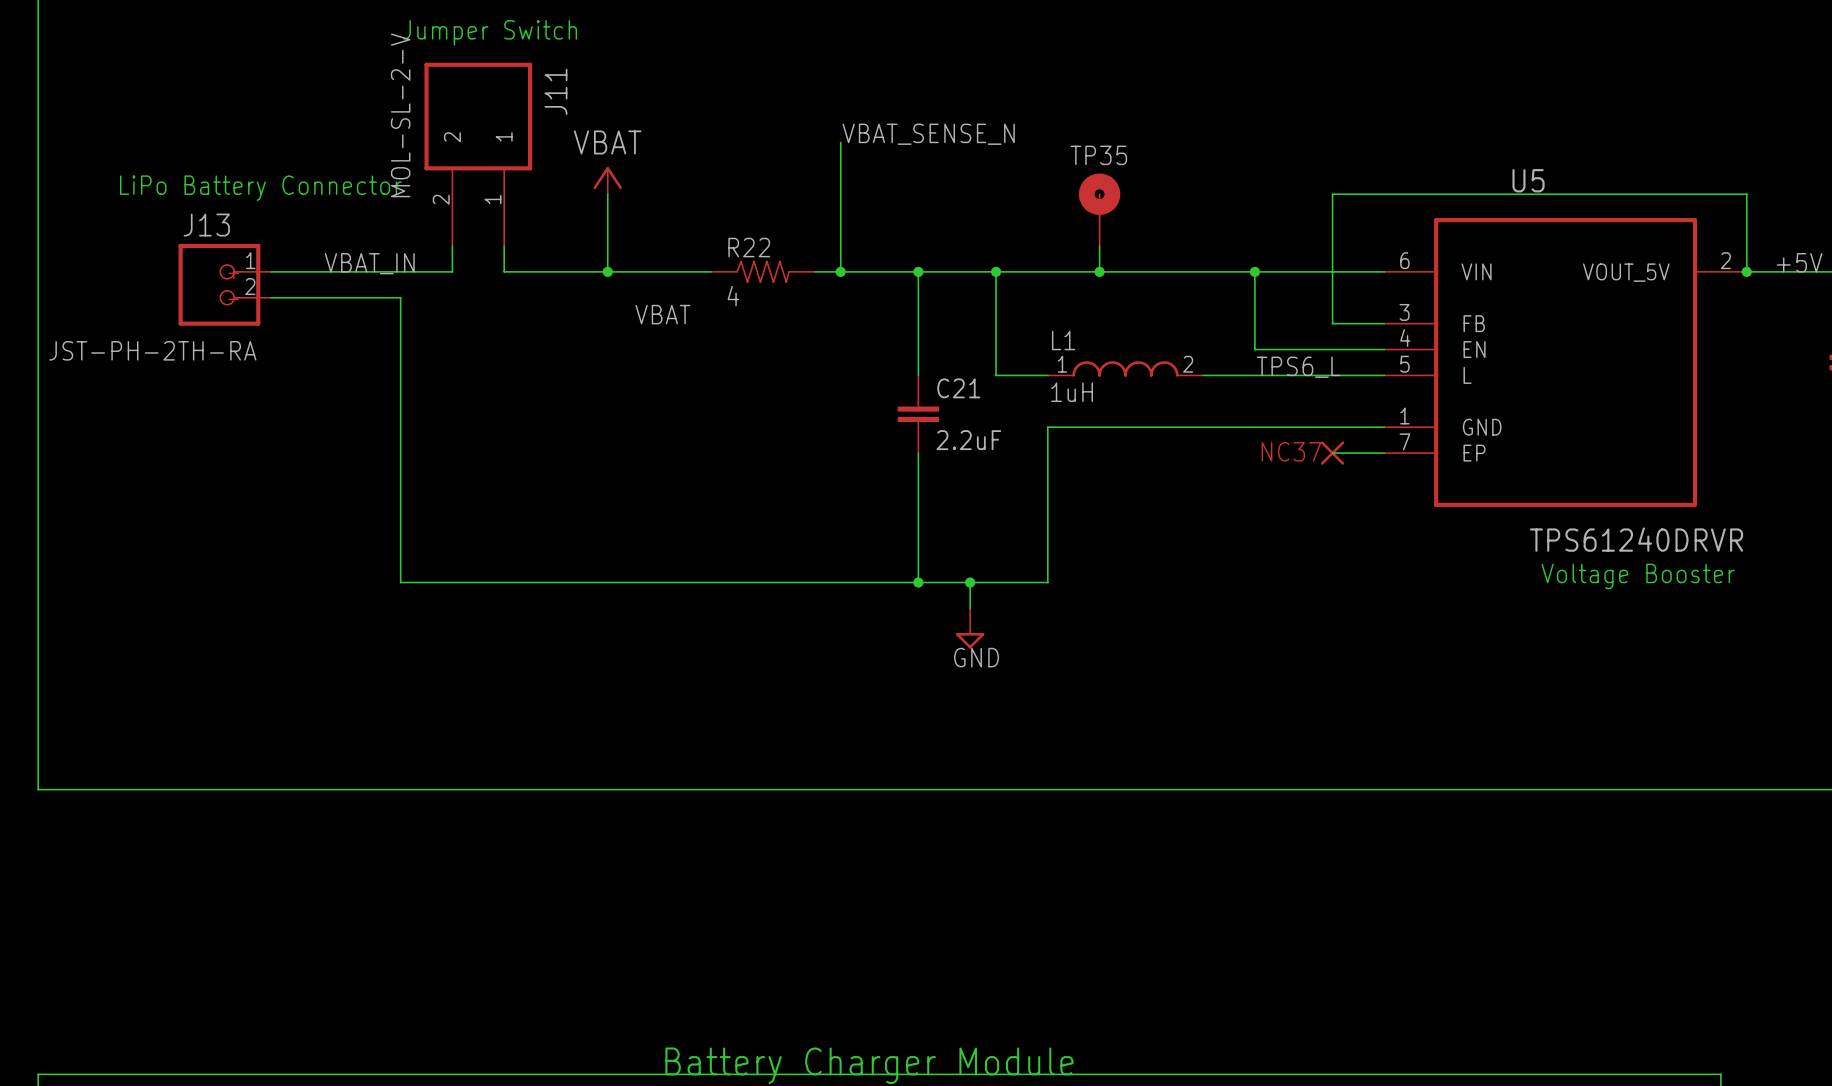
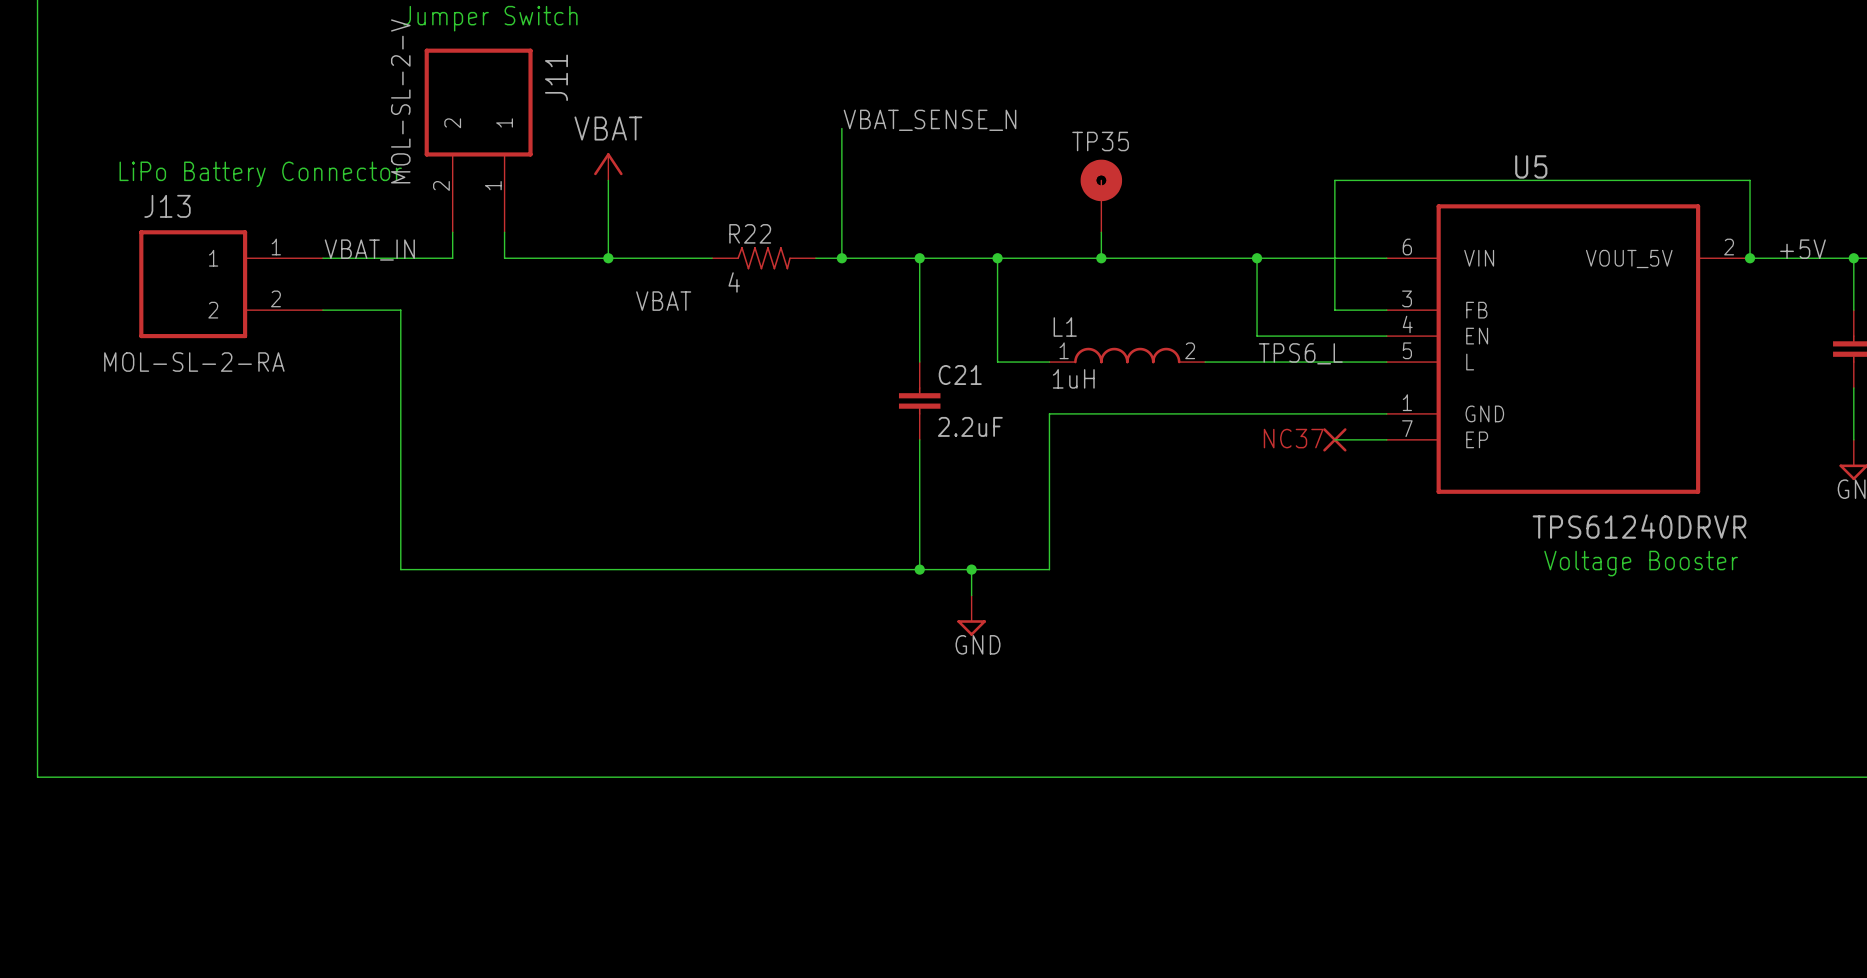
J13 name position: J13 (206, 225) -> J13 (167, 206)
J13 symbol: [178, 243, 272, 326] -> [139, 230, 323, 339]
wire: (271, 297) (400, 297) (400, 323) -> (322, 310) (400, 310)
J13 value: JST-PH-2TH-RA (152, 350) -> MOL-SL-2-RA (194, 362)

